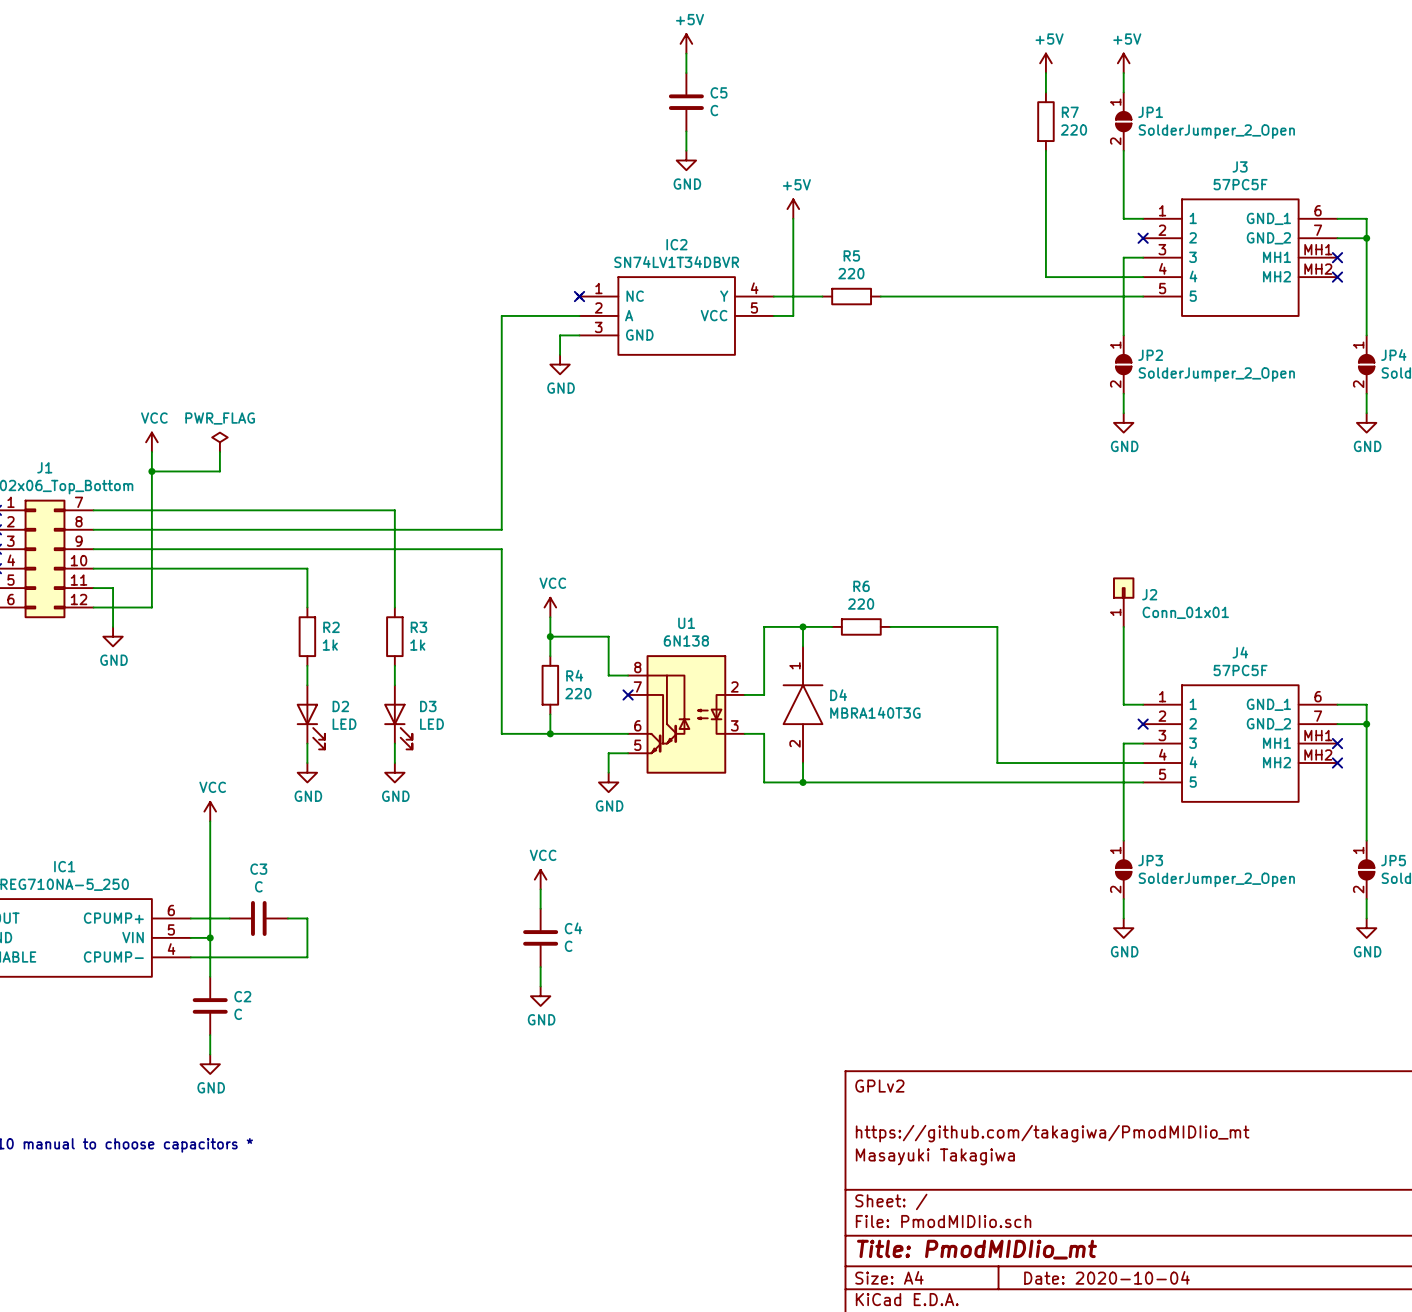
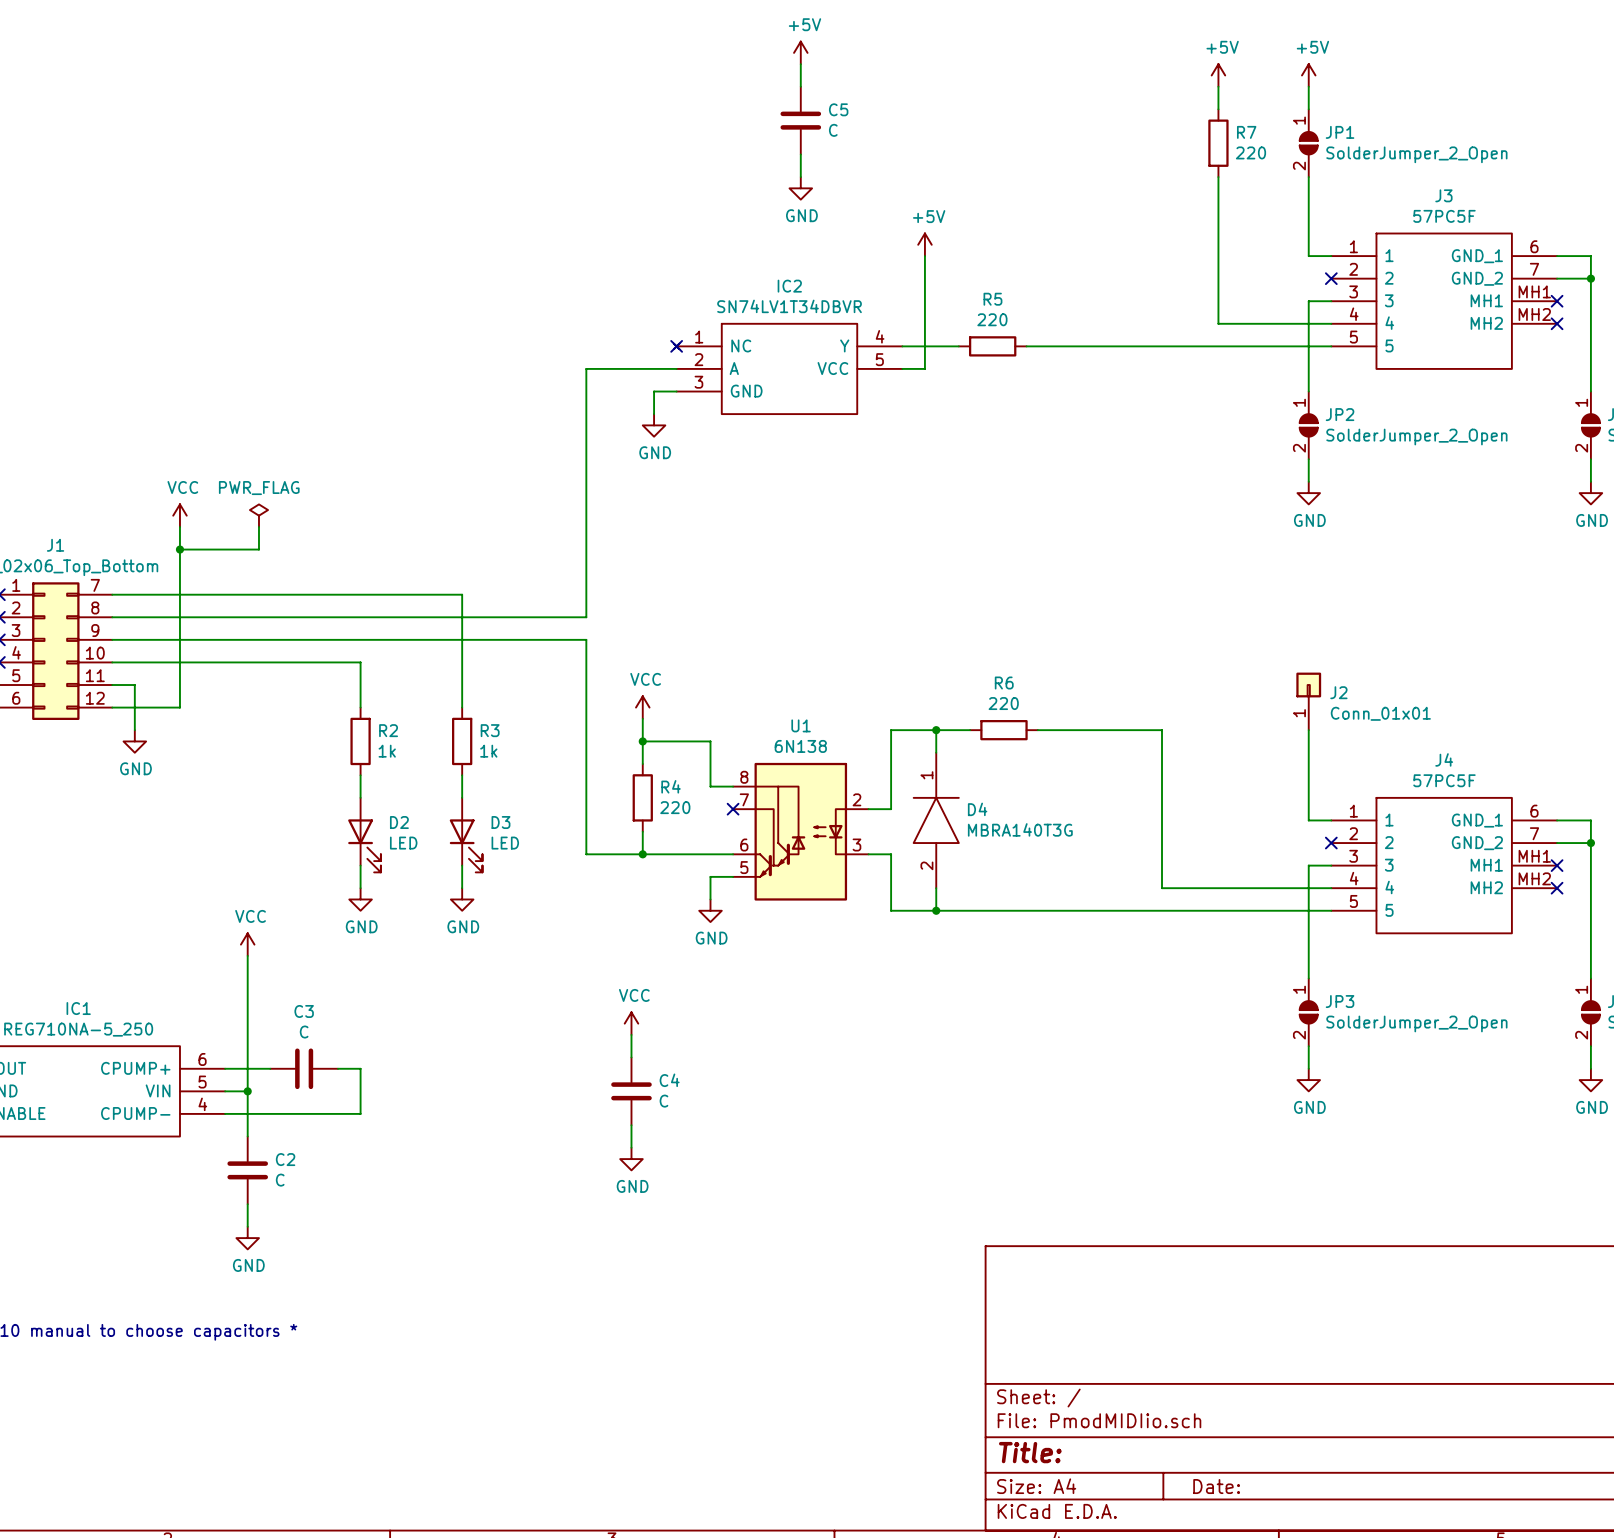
title block: GPLv2 (879, 1086) -> none
title block: https://github.com/takagiwa/PmodMIDIio_mt (1052, 1133) -> none
title block: Masayuki Takagiwa (935, 1156) -> none
title block: Title: PmodMIDIio_mt (977, 1249) -> Title: (1030, 1452)
title block: Date: 2020-10-04 (1106, 1277) -> Date: (1216, 1486)

